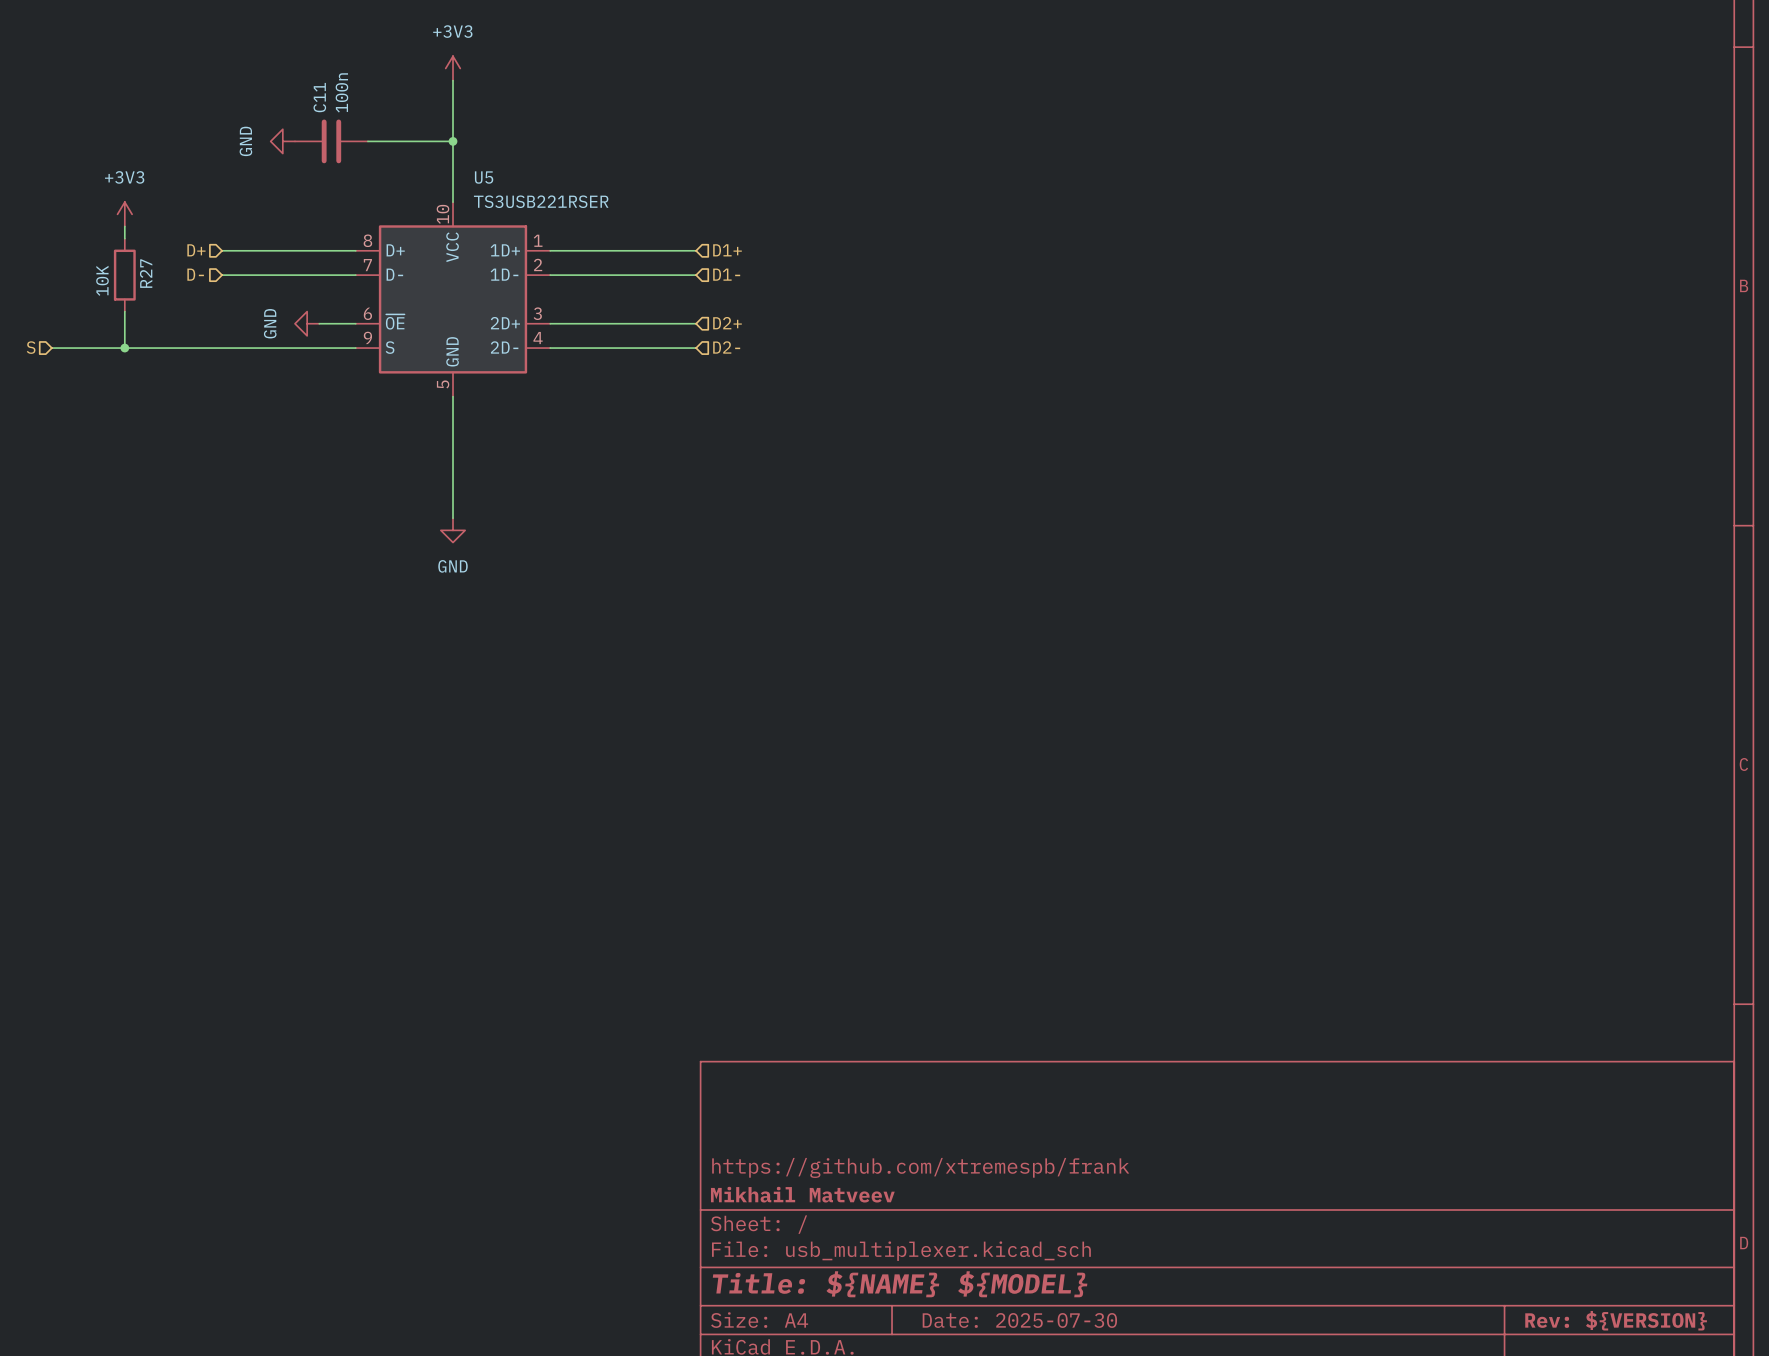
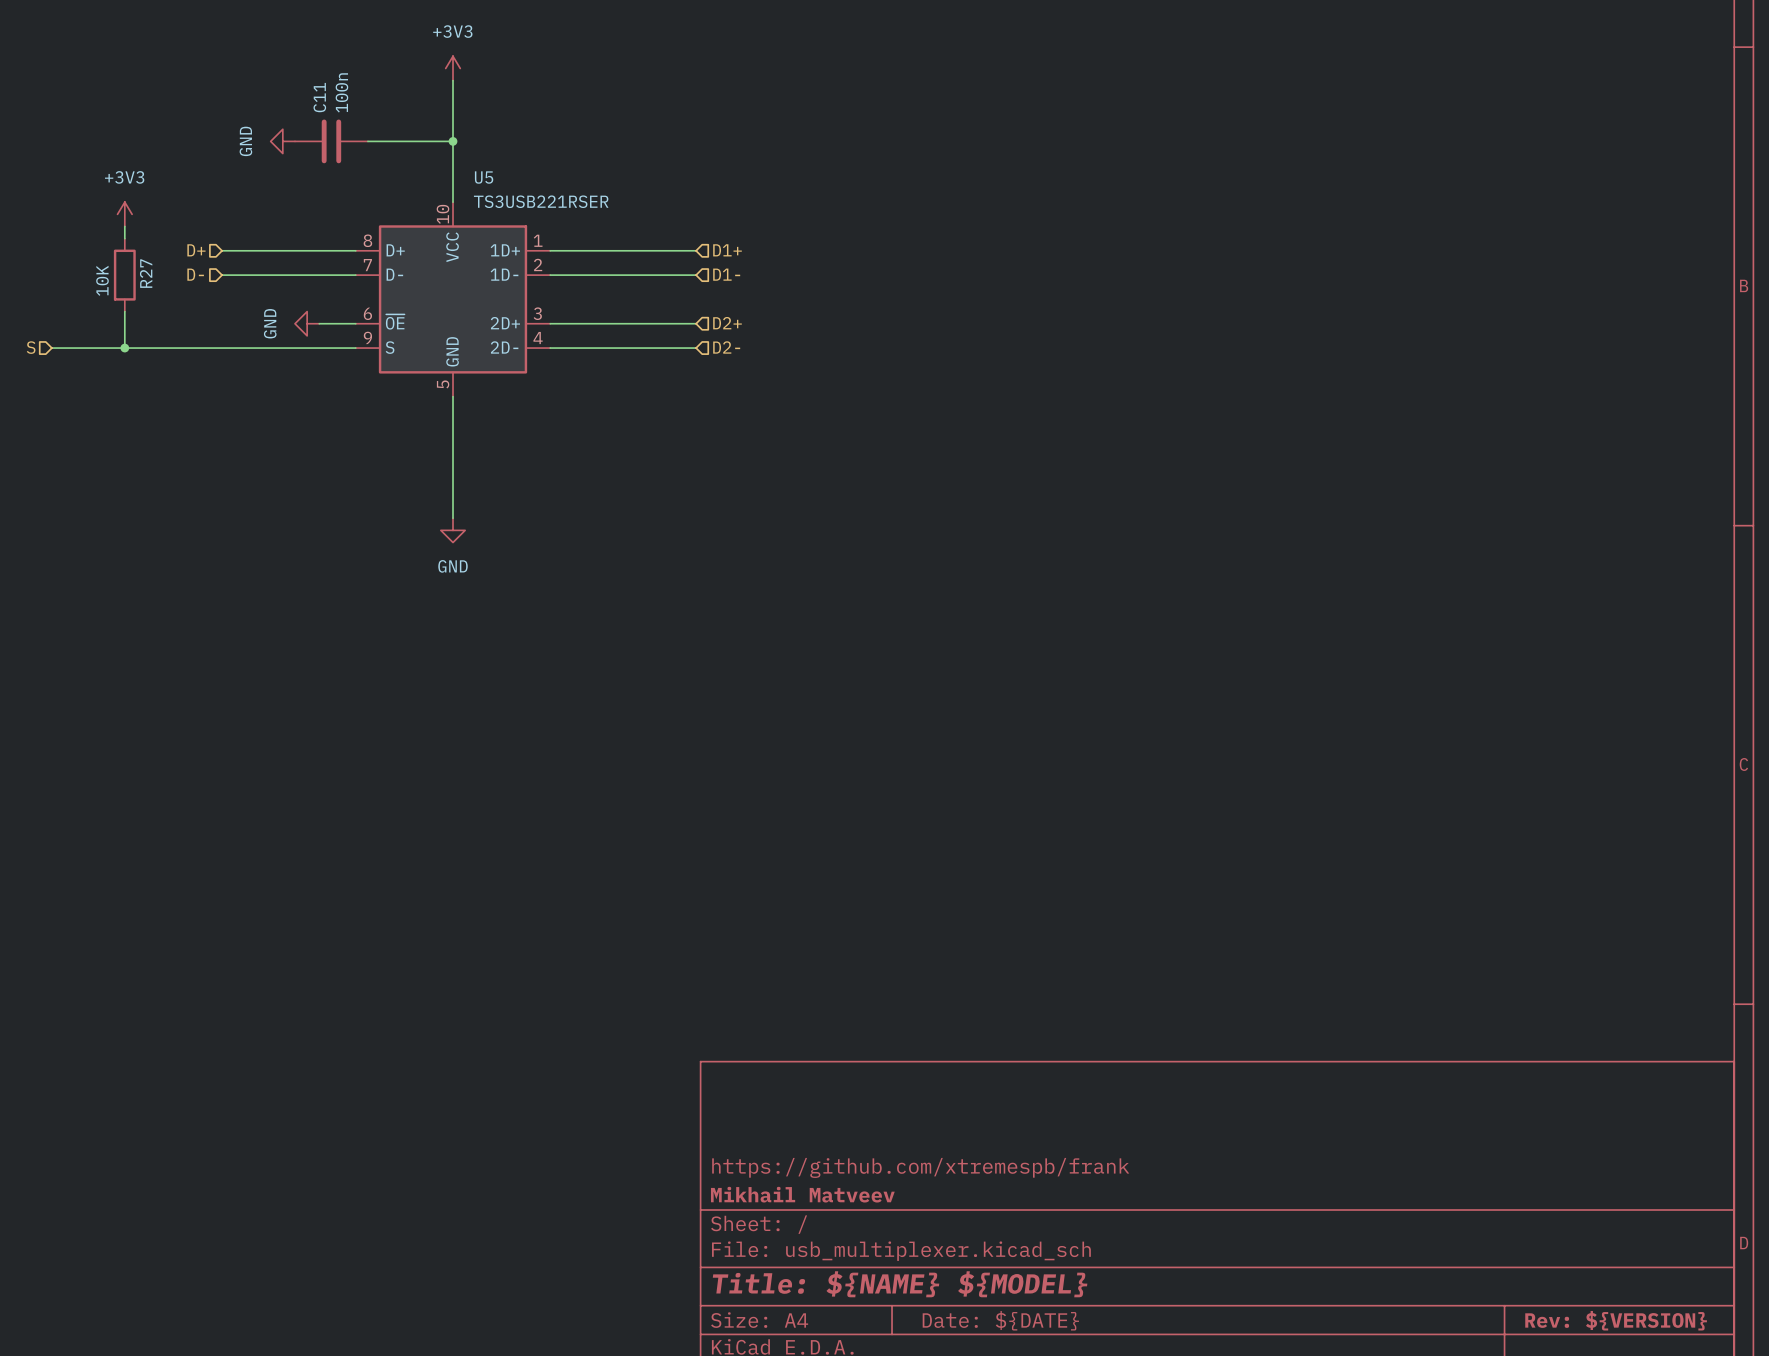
title block: Date: 2025-07-30 (1019, 1320) -> Date: ${DATE} (1000, 1320)

